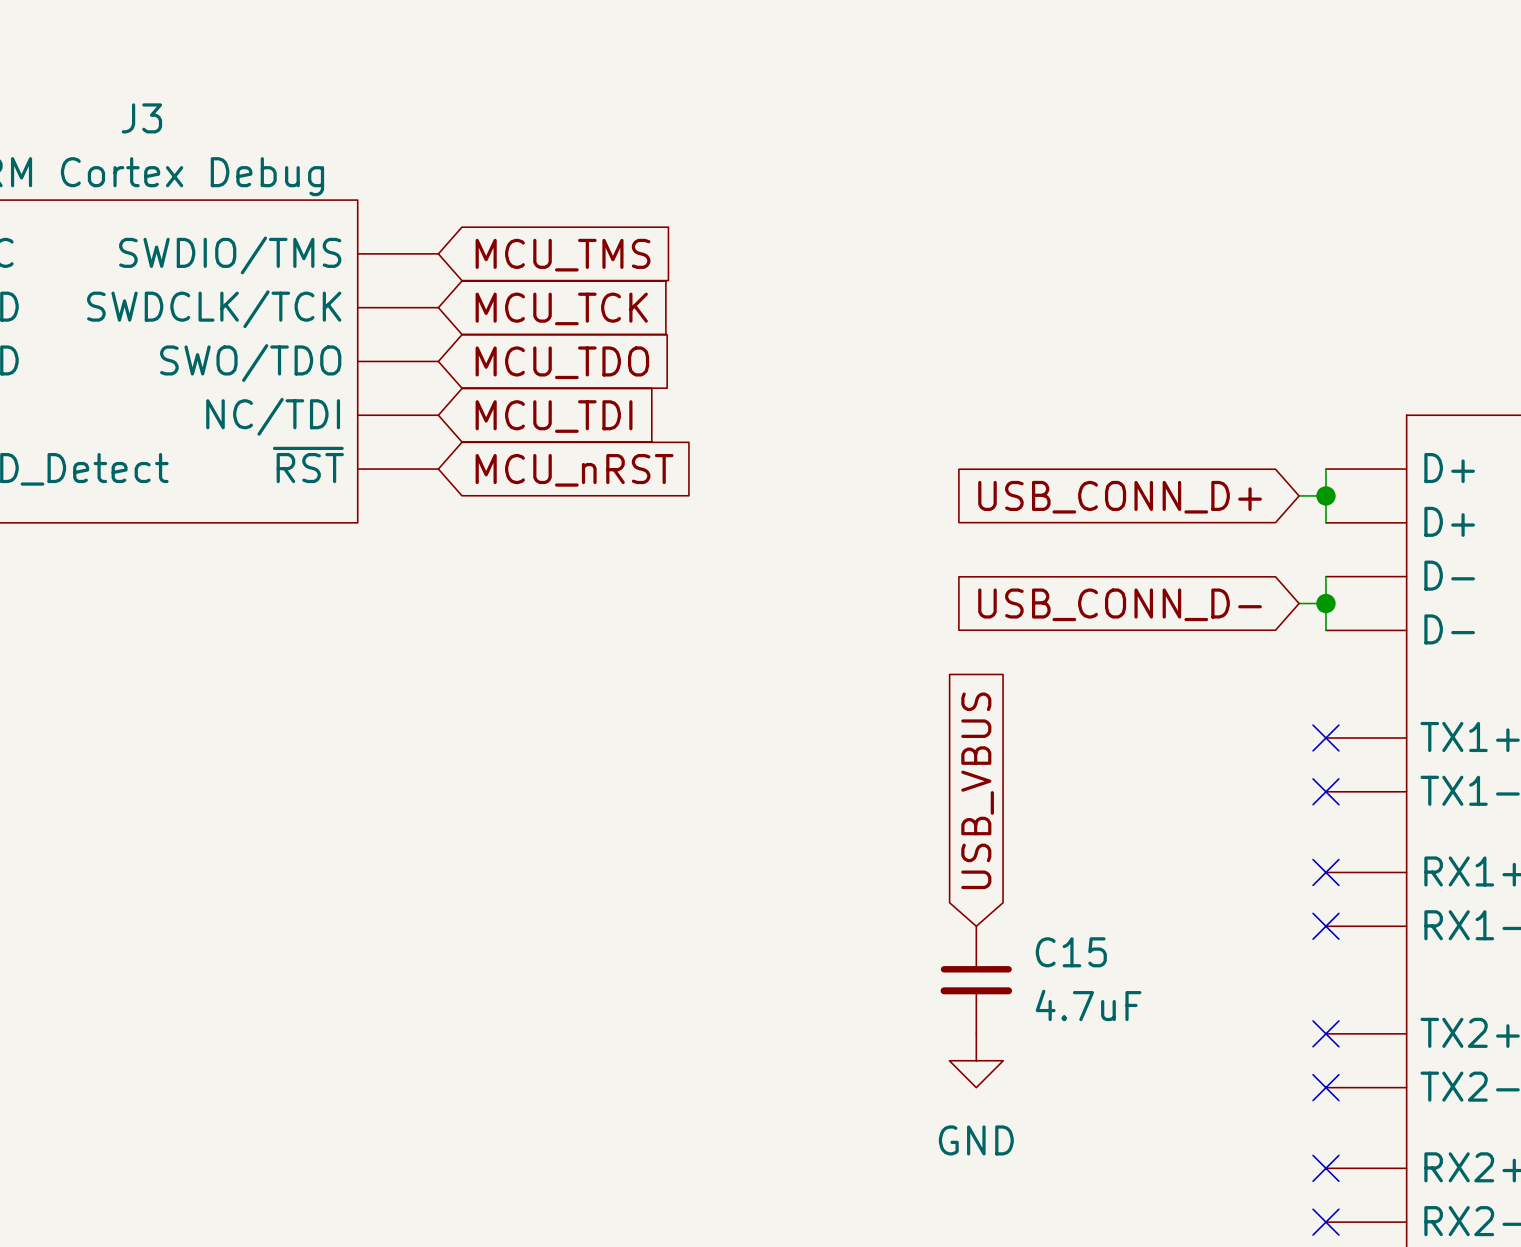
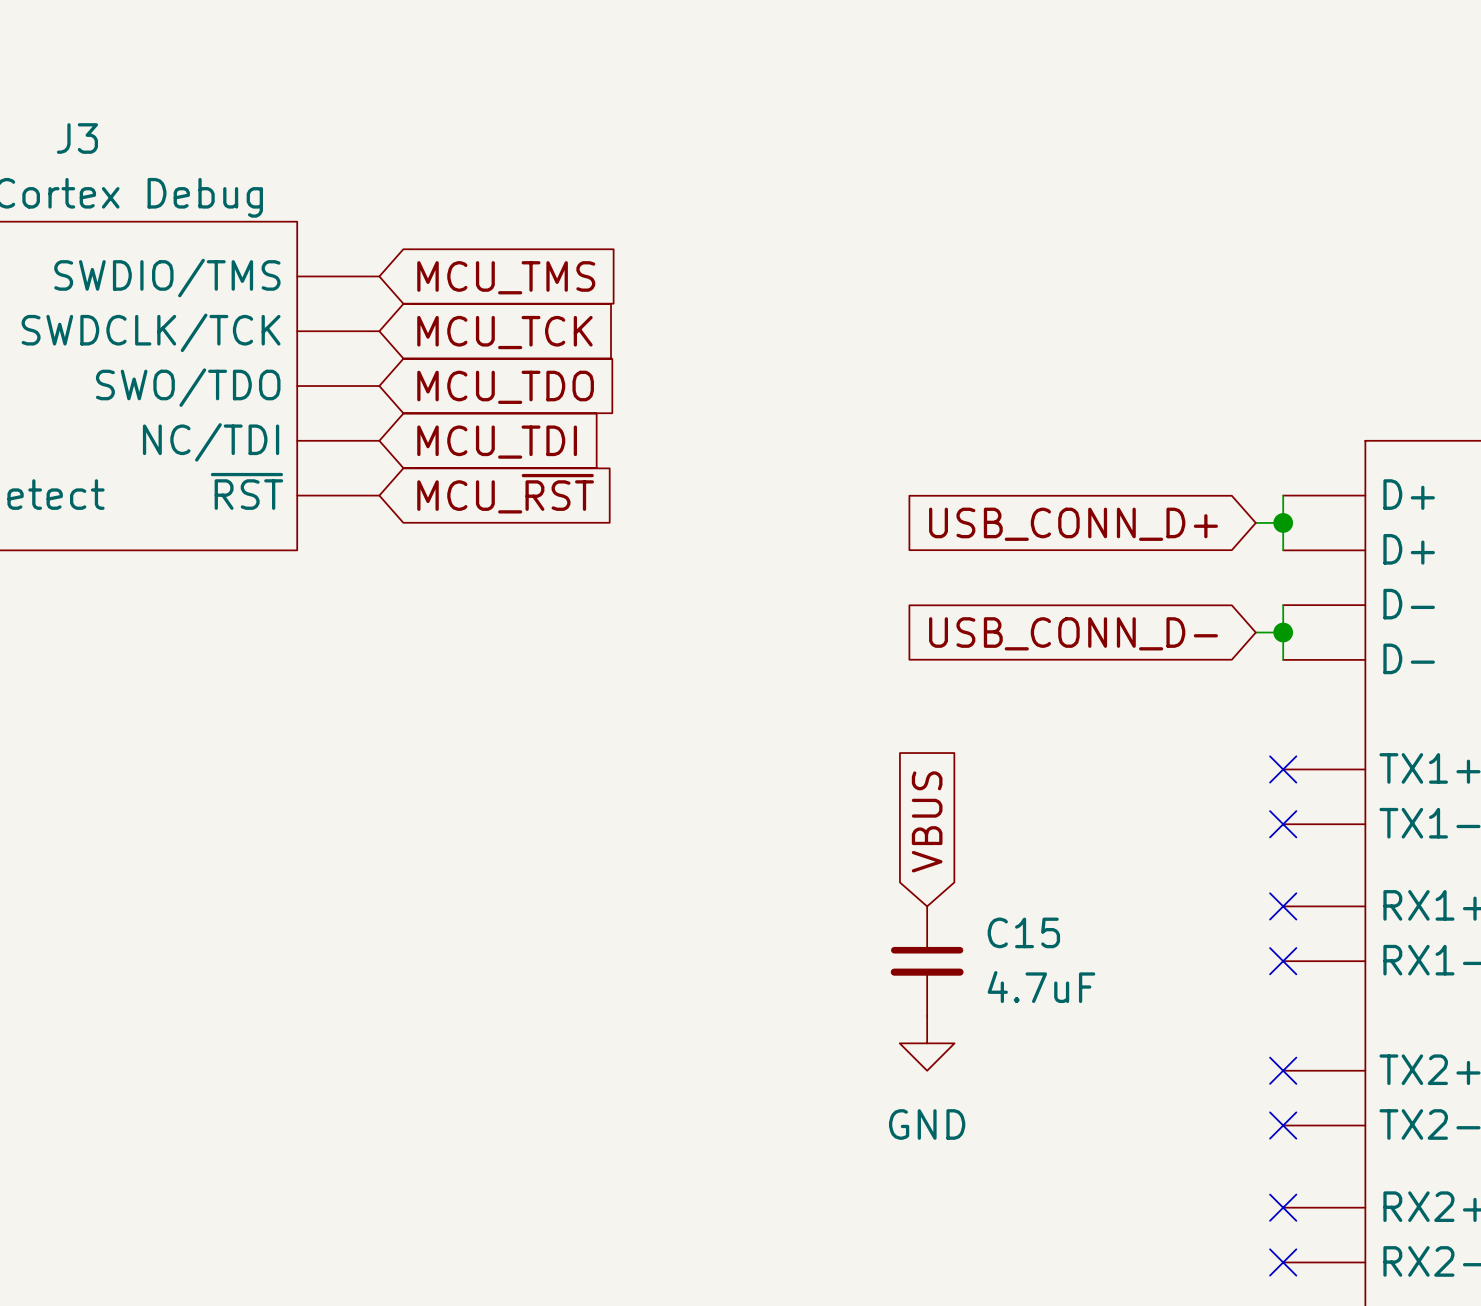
global label: MCU_nRST (574, 470) -> MCU_~{RST} (505, 493)
global label: USB_VBUS (977, 790) -> VBUS (927, 821)
C15 position: (976, 980) -> (927, 961)
power symbol position: GND (976, 1060) -> GND (927, 1043)

